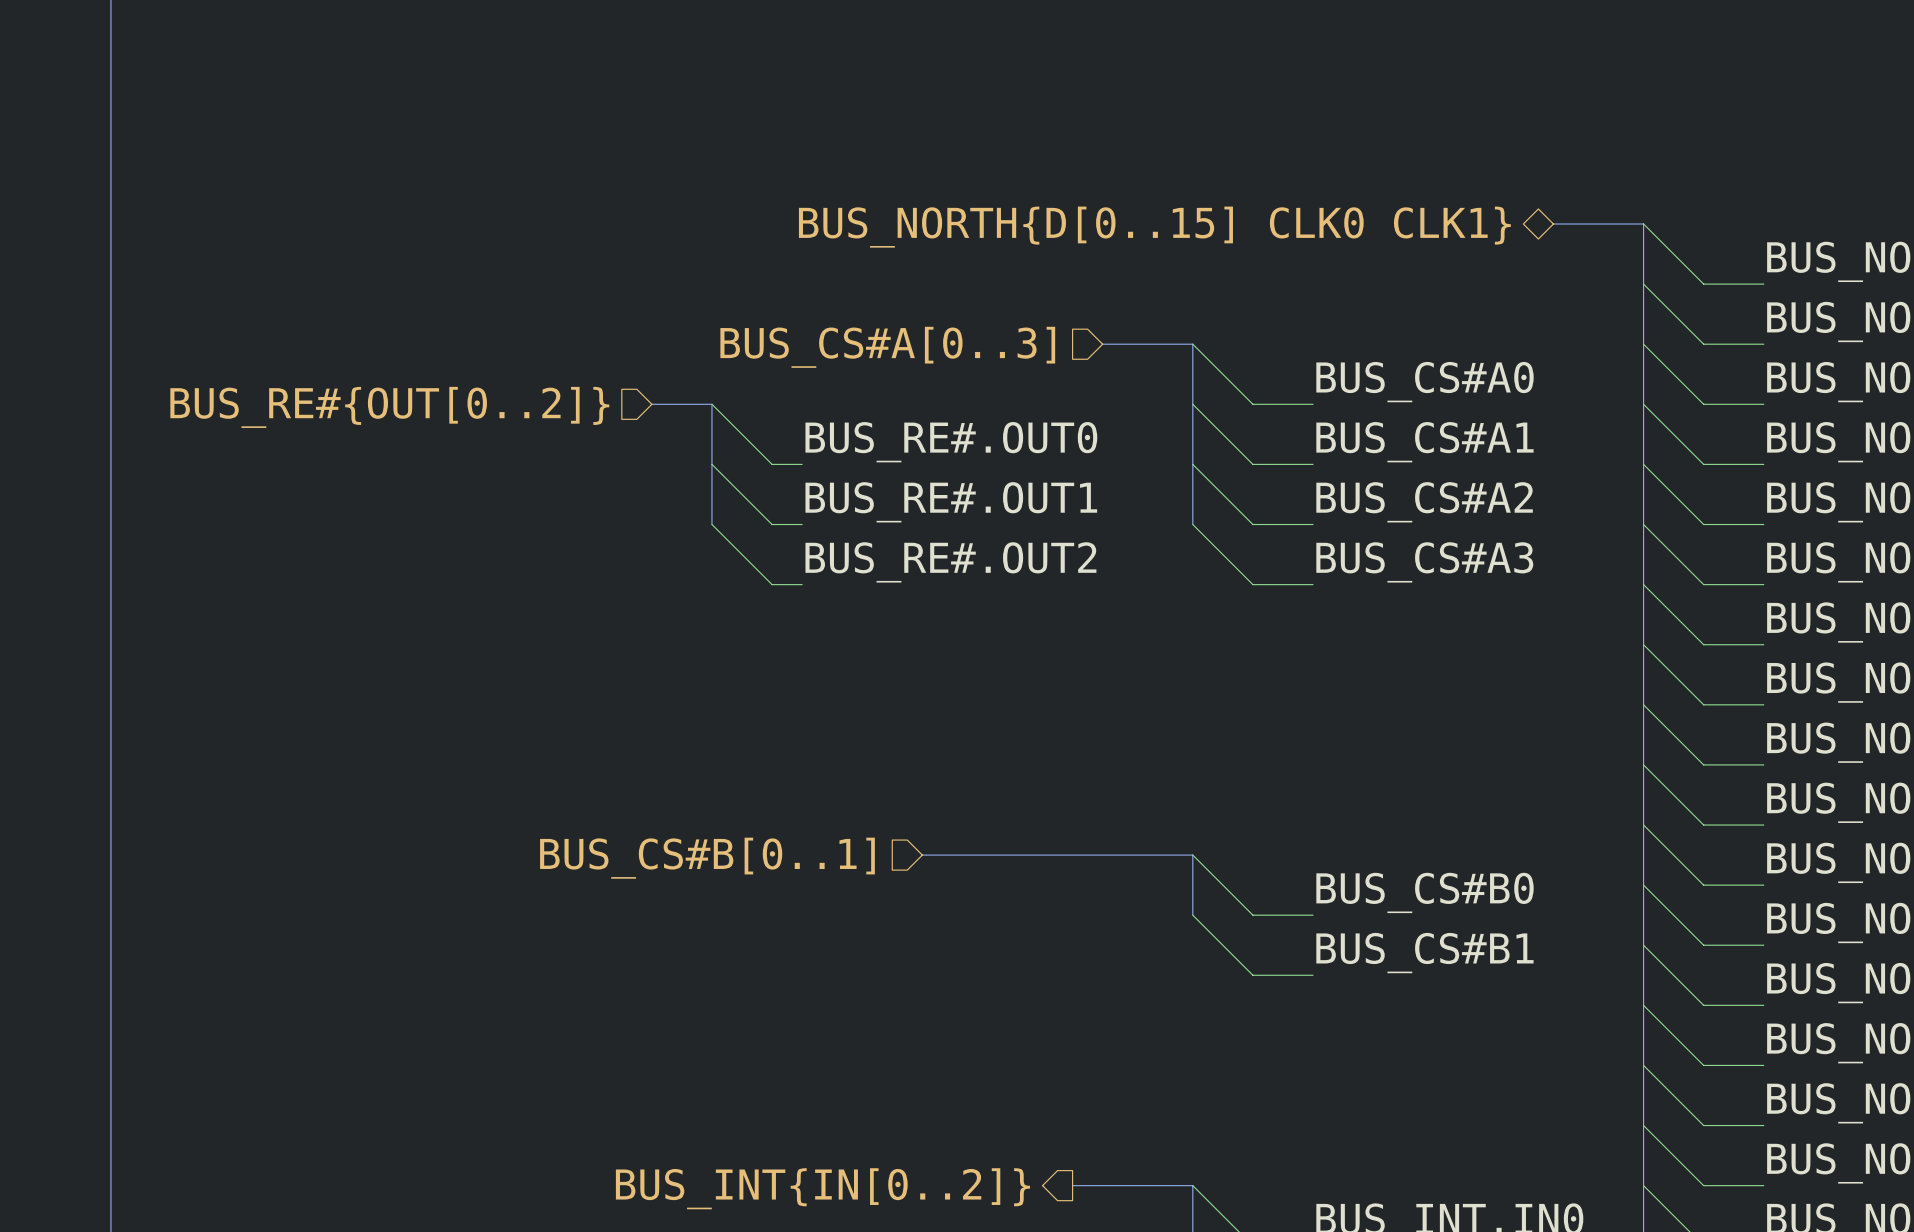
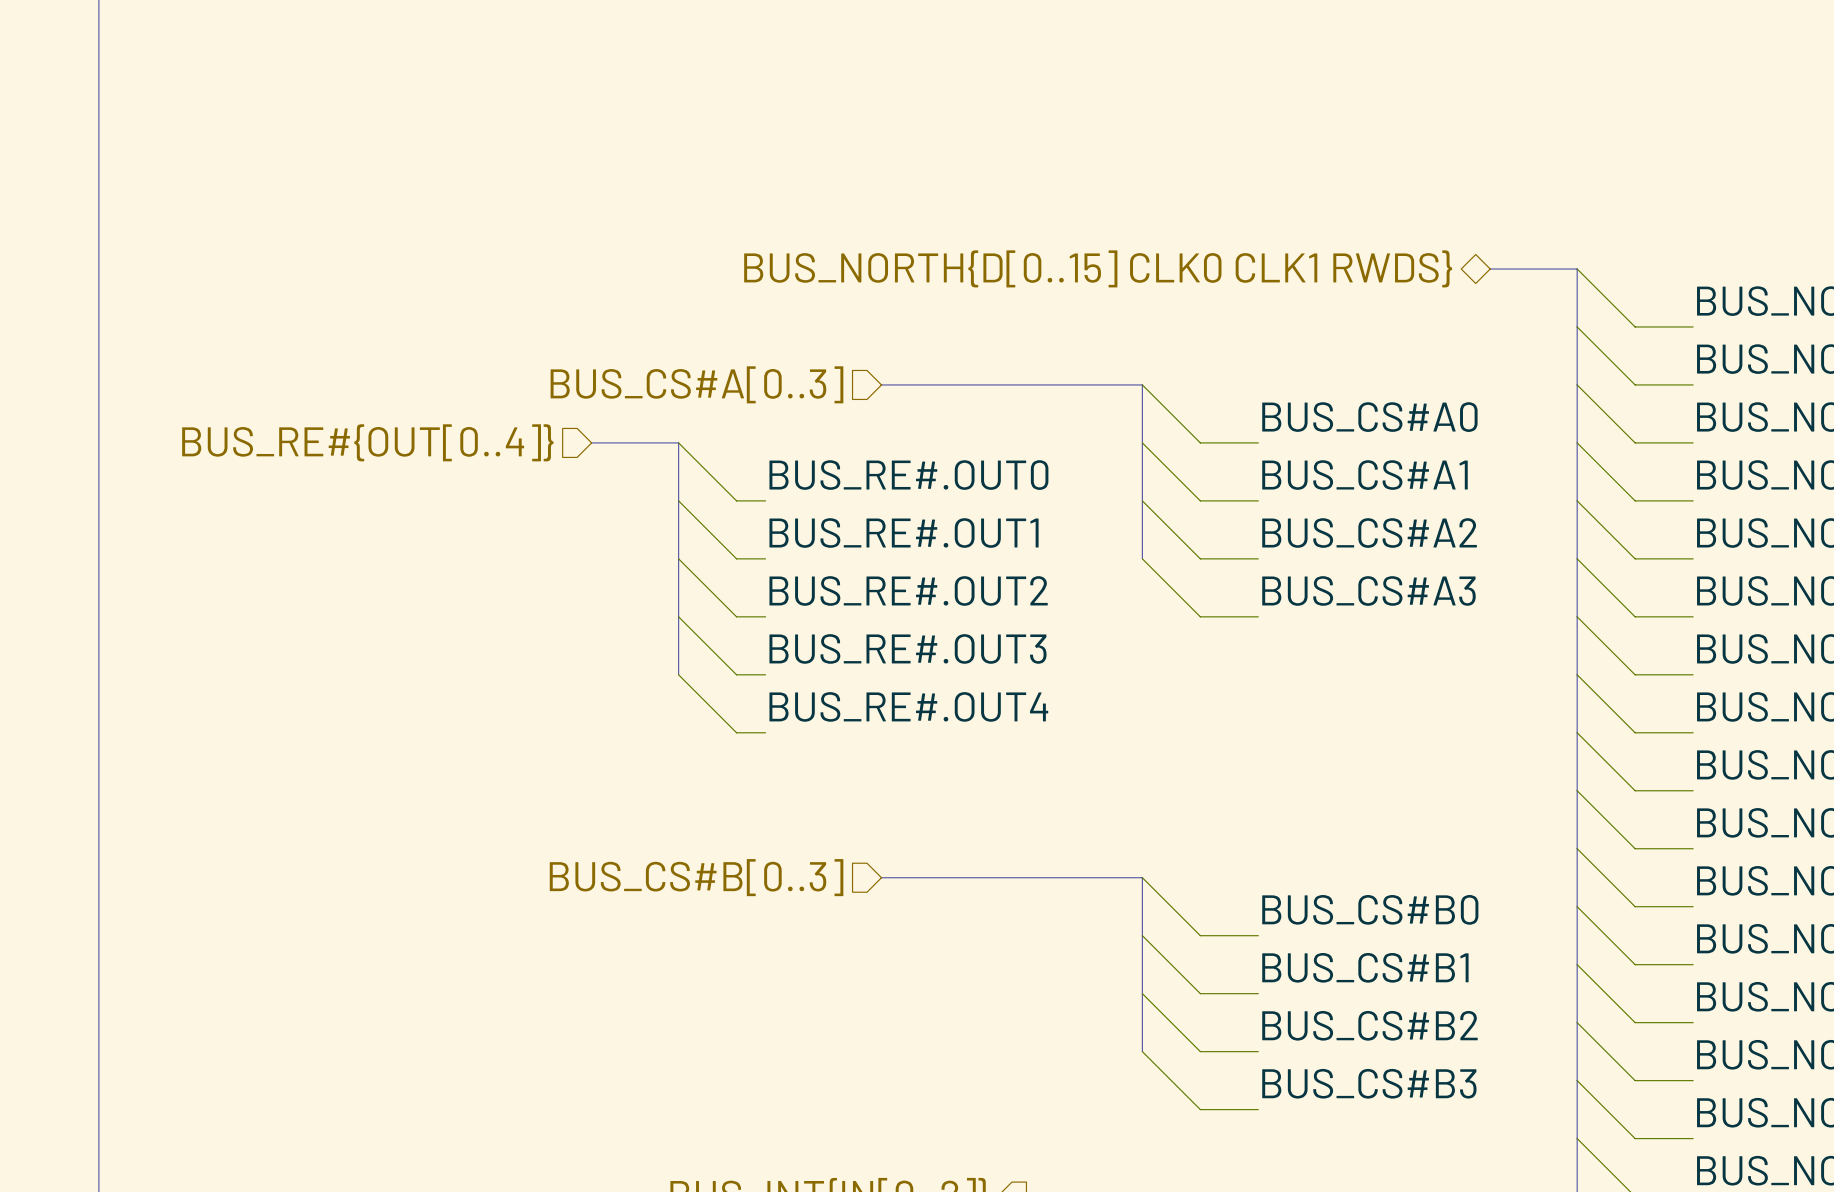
hierarchical label: BUS_NORTH{D[0..15] CLK0 CLK1} (1154, 227) -> BUS_NORTH{D[0..15] CLK0 CLK1 RWDS} (1098, 268)
bus: none -> (881, 384) (1055, 384)
hierarchical label position: BUS_CS#A[0..3] (887, 347) -> BUS_CS#A[0..3] (696, 384)
bus: none -> (591, 442) (620, 442)
hierarchical label: BUS_RE#{OUT[0..2]} (389, 407) -> BUS_RE#{OUT[0..4]} (367, 442)
bus: none -> (678, 558) (678, 674)
wire: none -> (678, 616) (736, 674) (765, 674)
label: none -> BUS_RE#.OUT3 (908, 648)
wire: none -> (678, 674) (736, 732) (765, 732)
label: none -> BUS_RE#.OUT4 (908, 706)
hierarchical label: BUS_CS#B[0..1] (707, 858) -> BUS_CS#B[0..3] (696, 877)
bus: none -> (1142, 935) (1142, 1051)
wire: none -> (1142, 993) (1200, 1051) (1258, 1051)
label: none -> BUS_CS#B2 (1369, 1025)
wire: none -> (1142, 1051) (1200, 1109) (1258, 1109)
label: none -> BUS_CS#B3 (1369, 1083)

